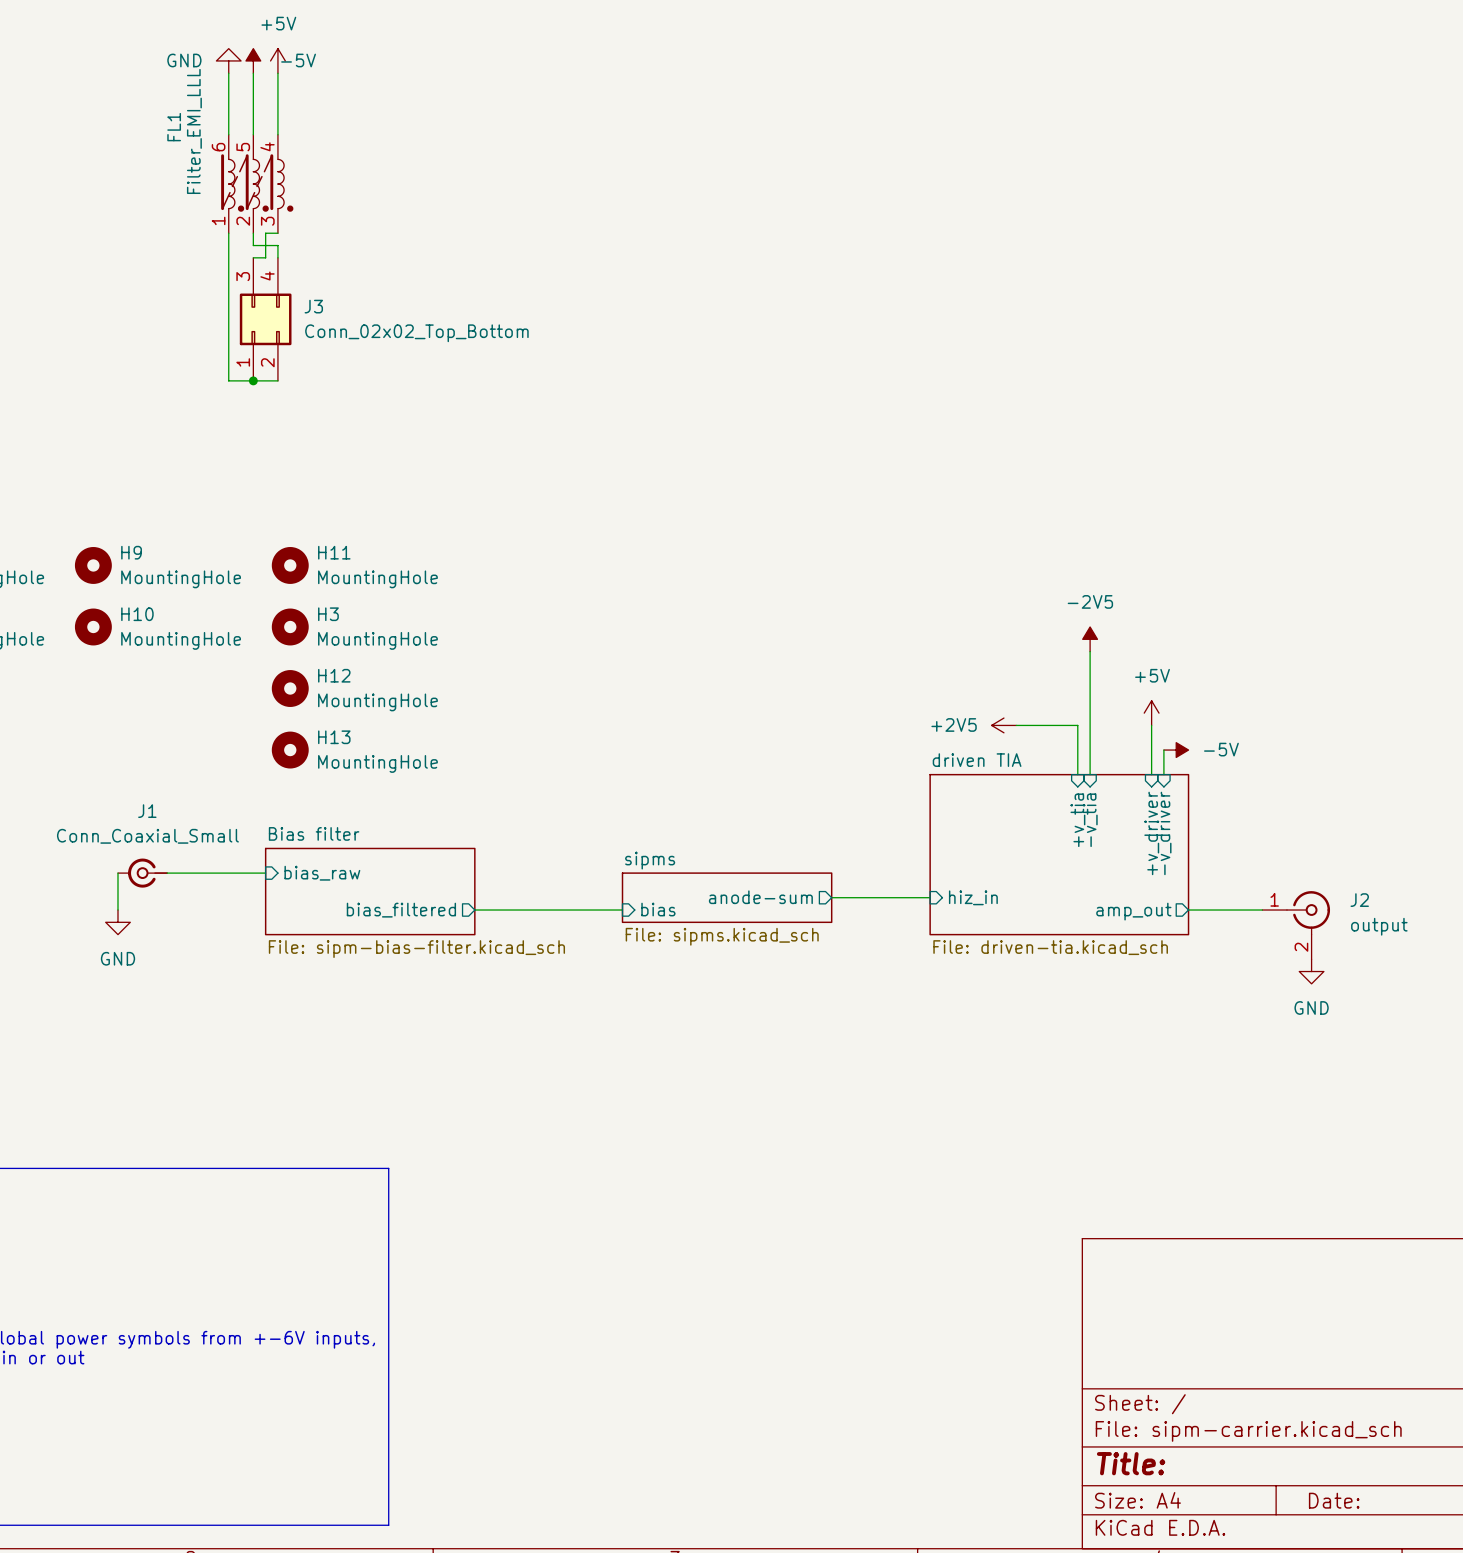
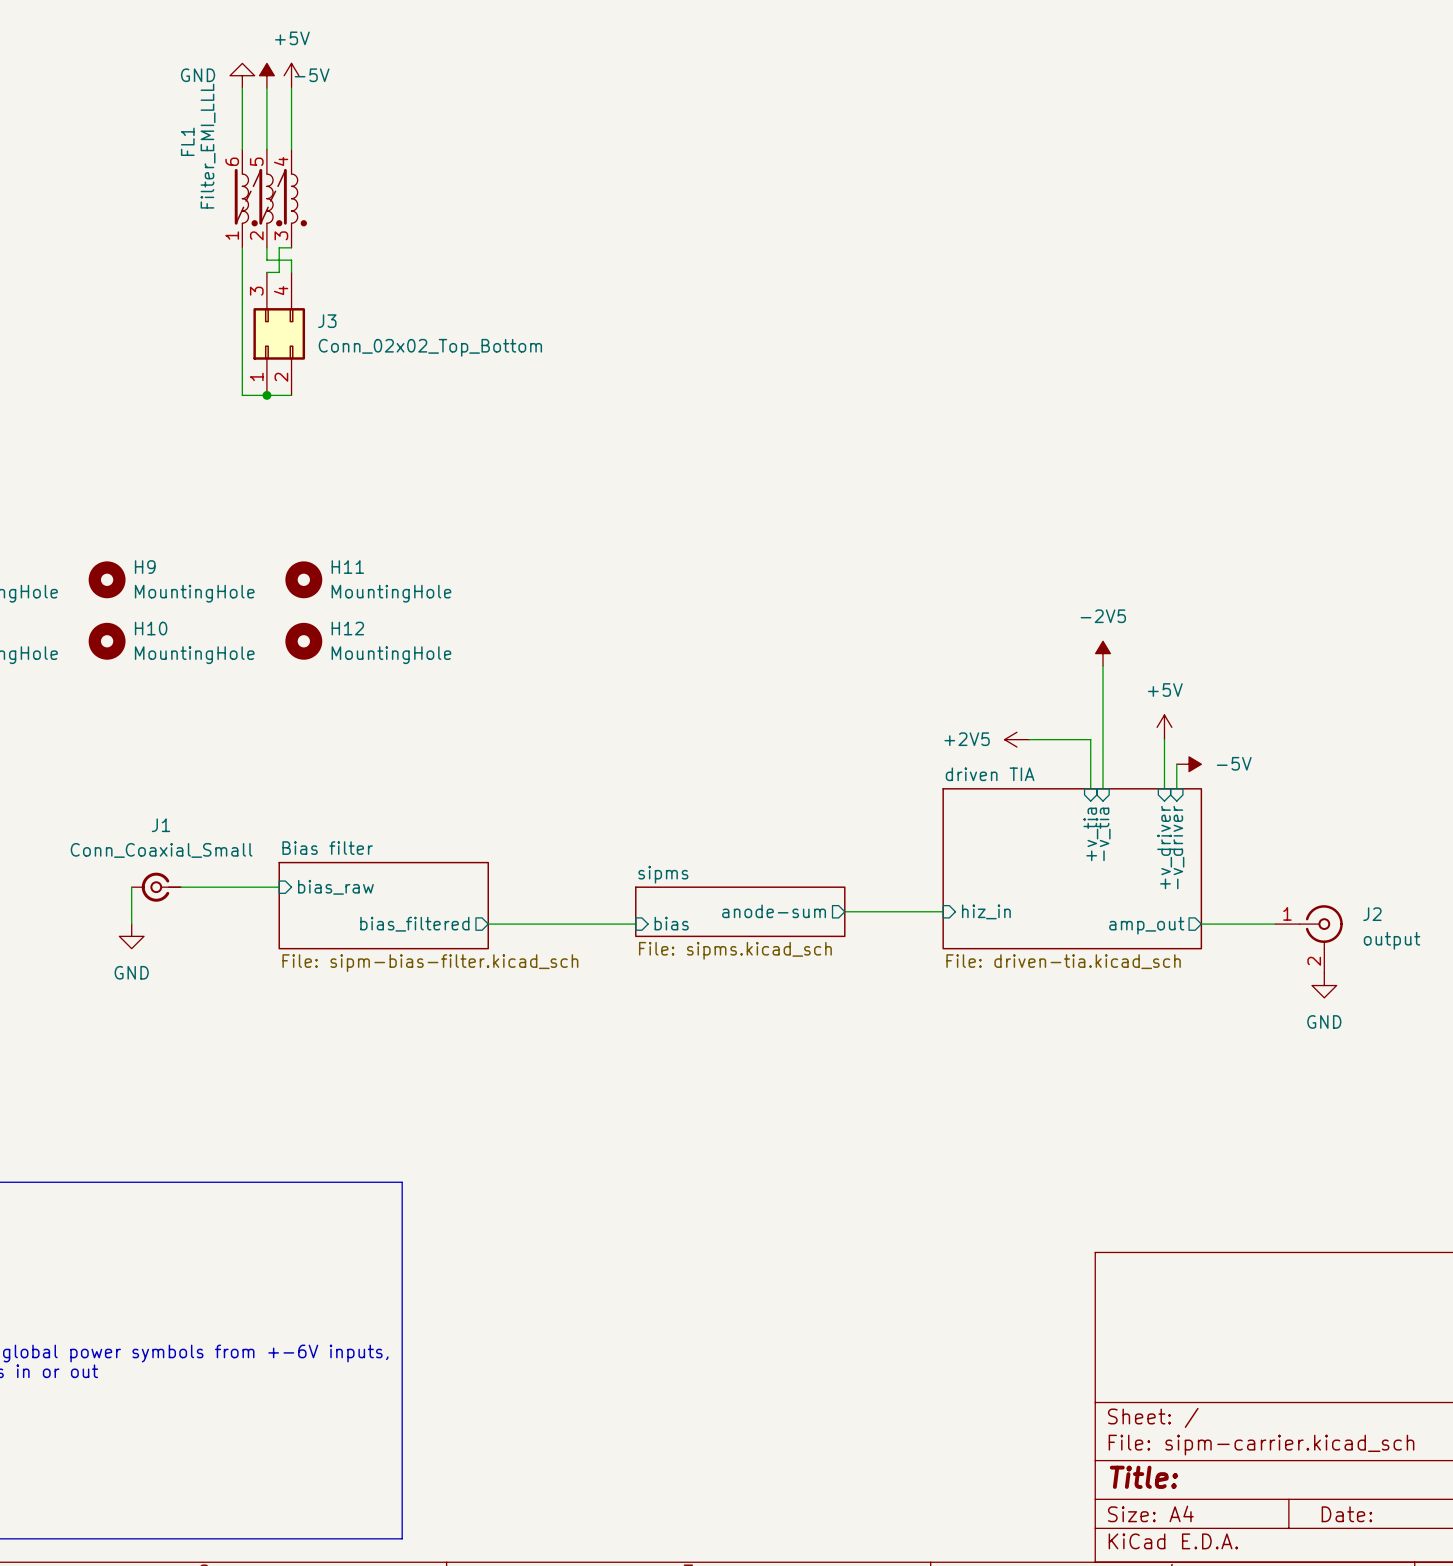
H3 name: H3 (328, 614) -> H12 (347, 628)
H12: MountingHole (290, 688) -> none
H13: MountingHole (290, 750) -> none

